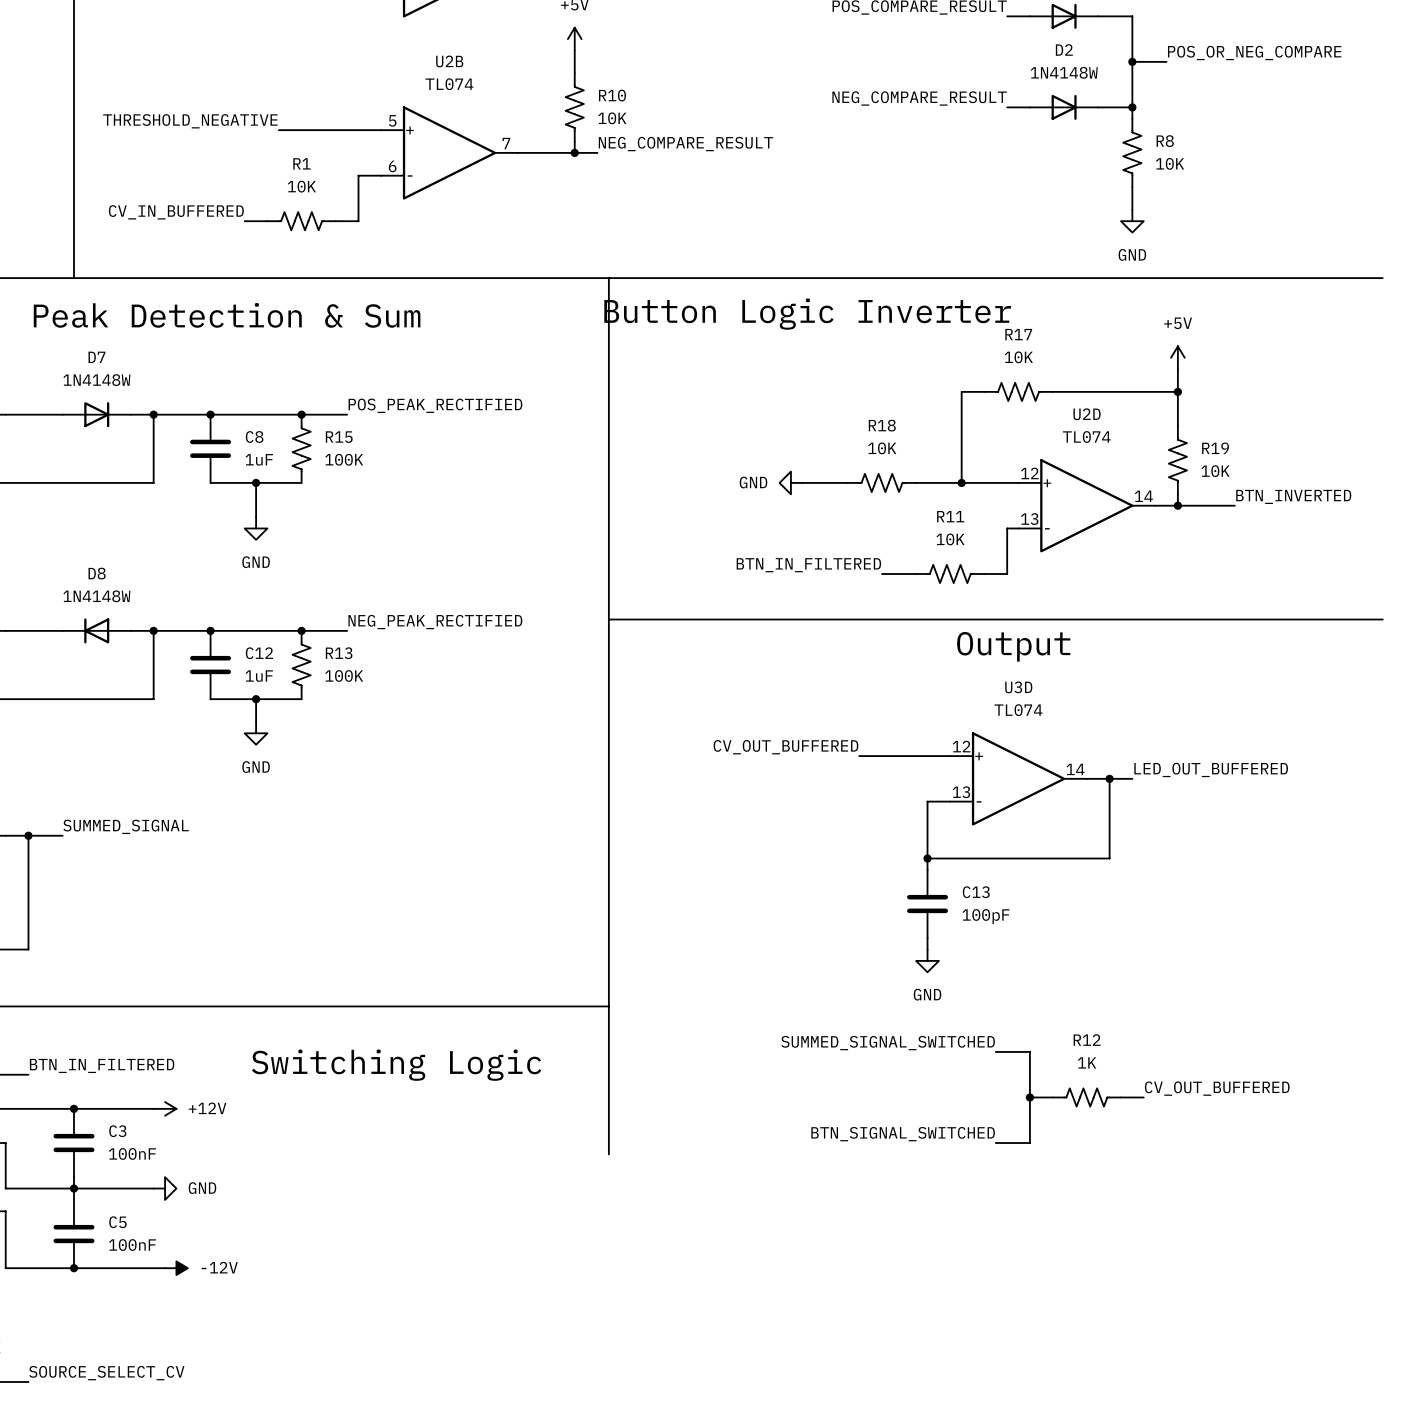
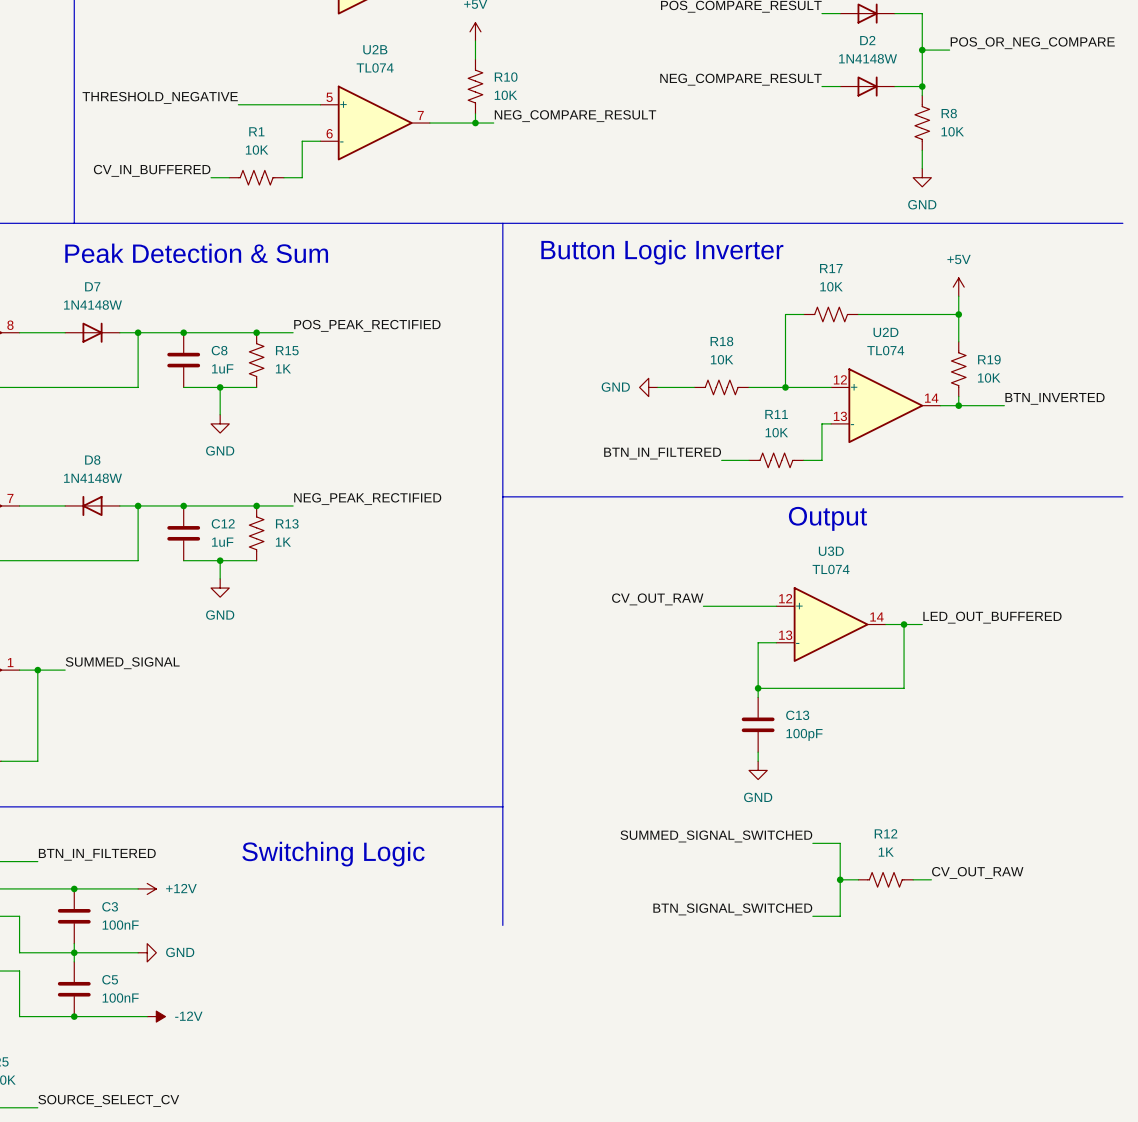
R15 value: 100K (344, 459) -> 1K (283, 368)
R13 value: 100K (344, 675) -> 1K (283, 542)
label: CV_OUT_BUFFERED (785, 747) -> CV_OUT_RAW (657, 599)
label: CV_OUT_BUFFERED (1217, 1088) -> CV_OUT_RAW (977, 872)

